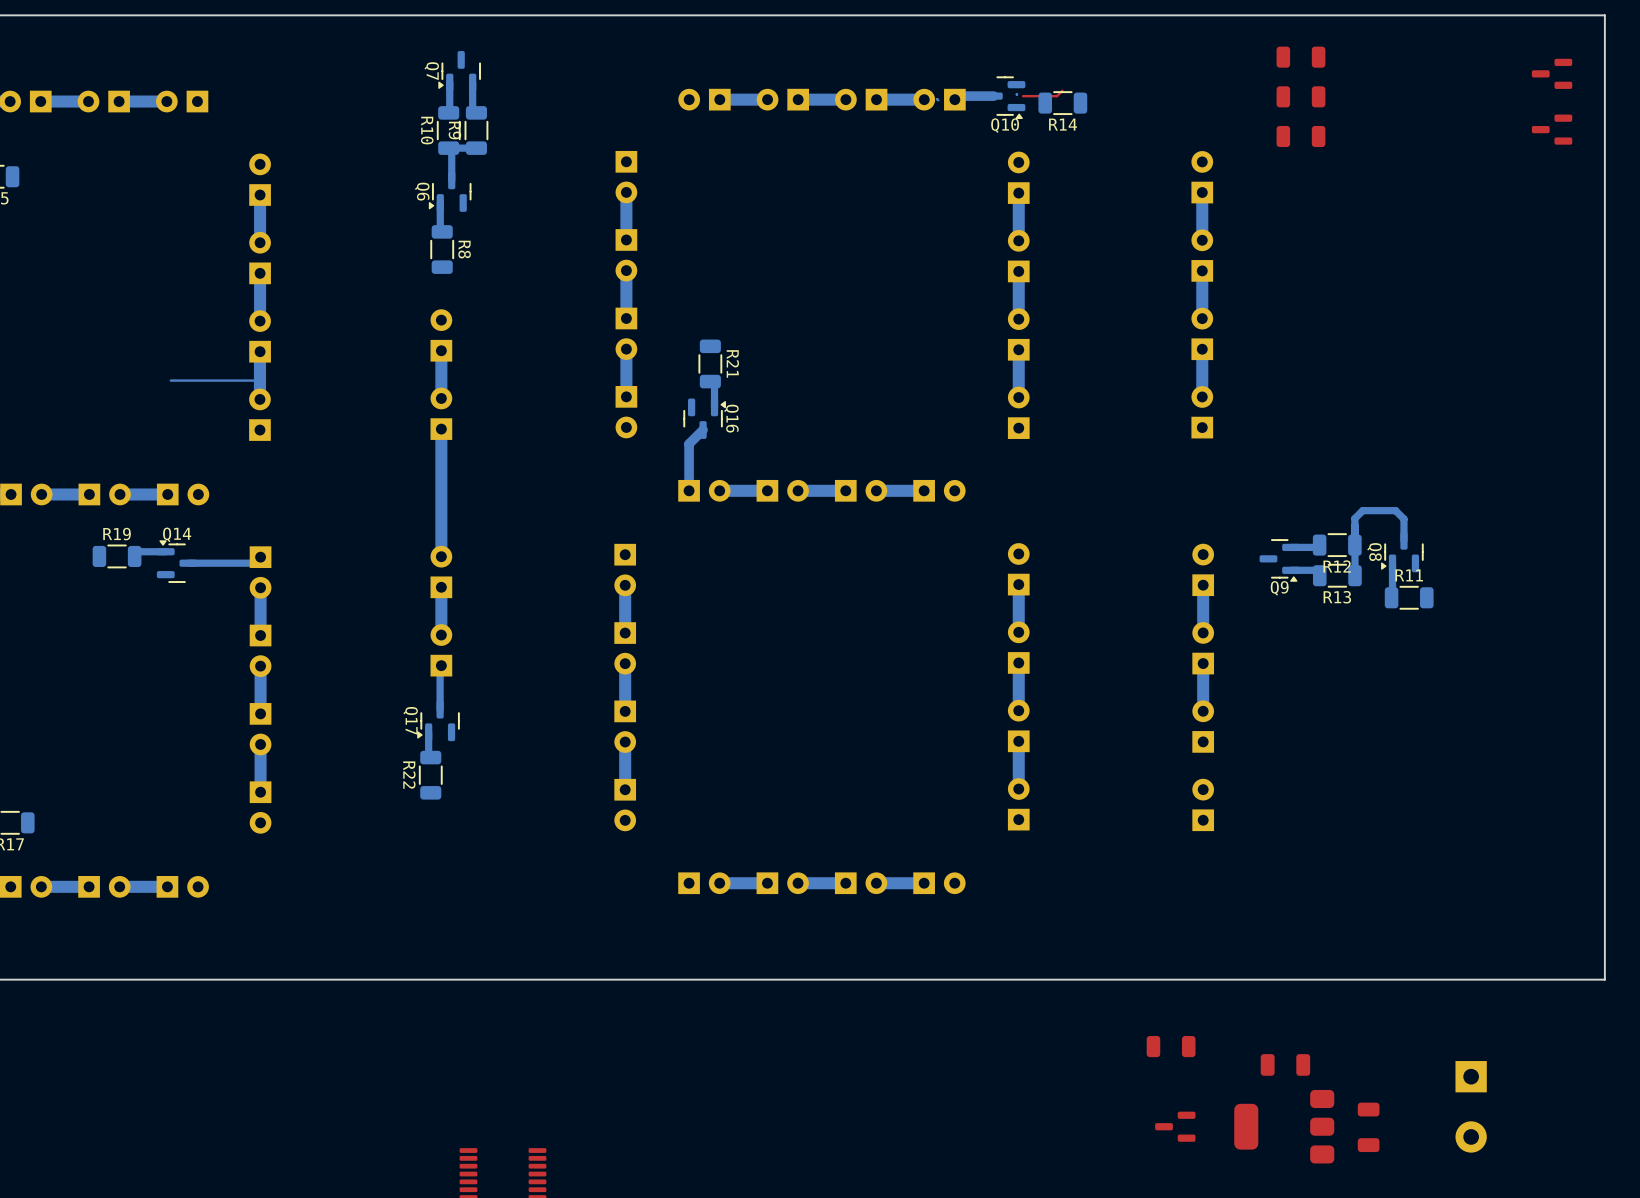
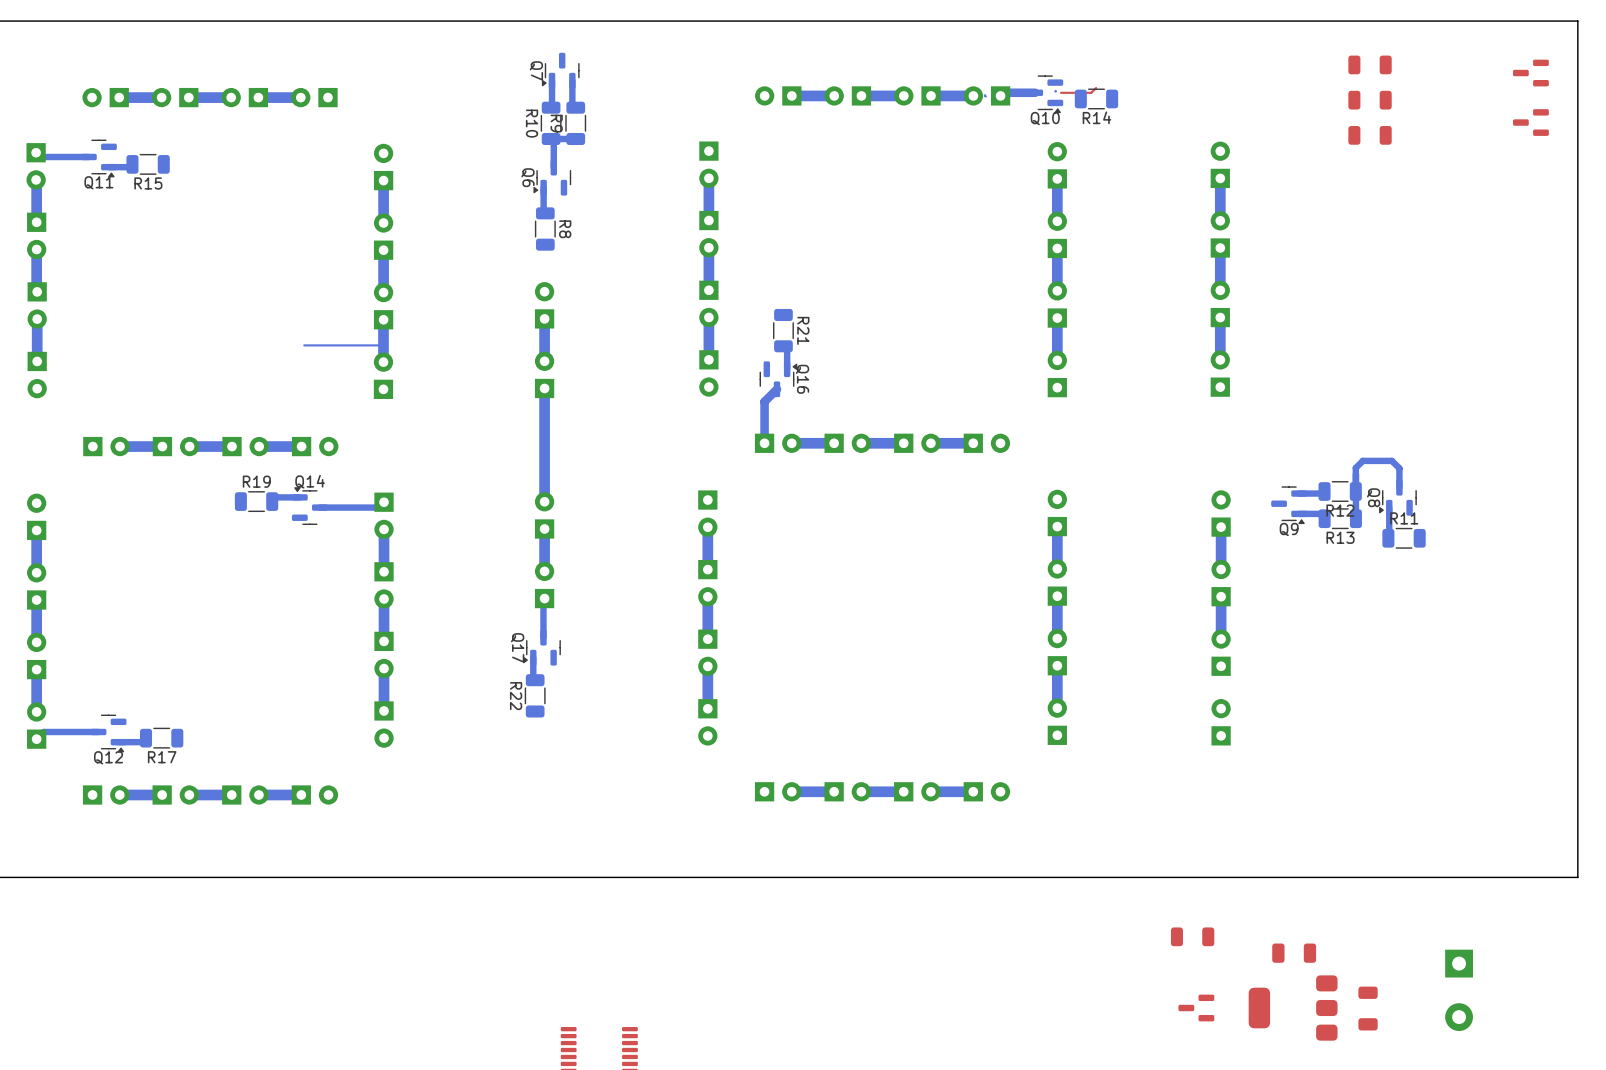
part: (1300, 57) -> none
part: none -> (1370, 64)
part: (1300, 96) -> none
part: none -> (1370, 100)
part: (1300, 136) -> none
part: none -> (1370, 135)

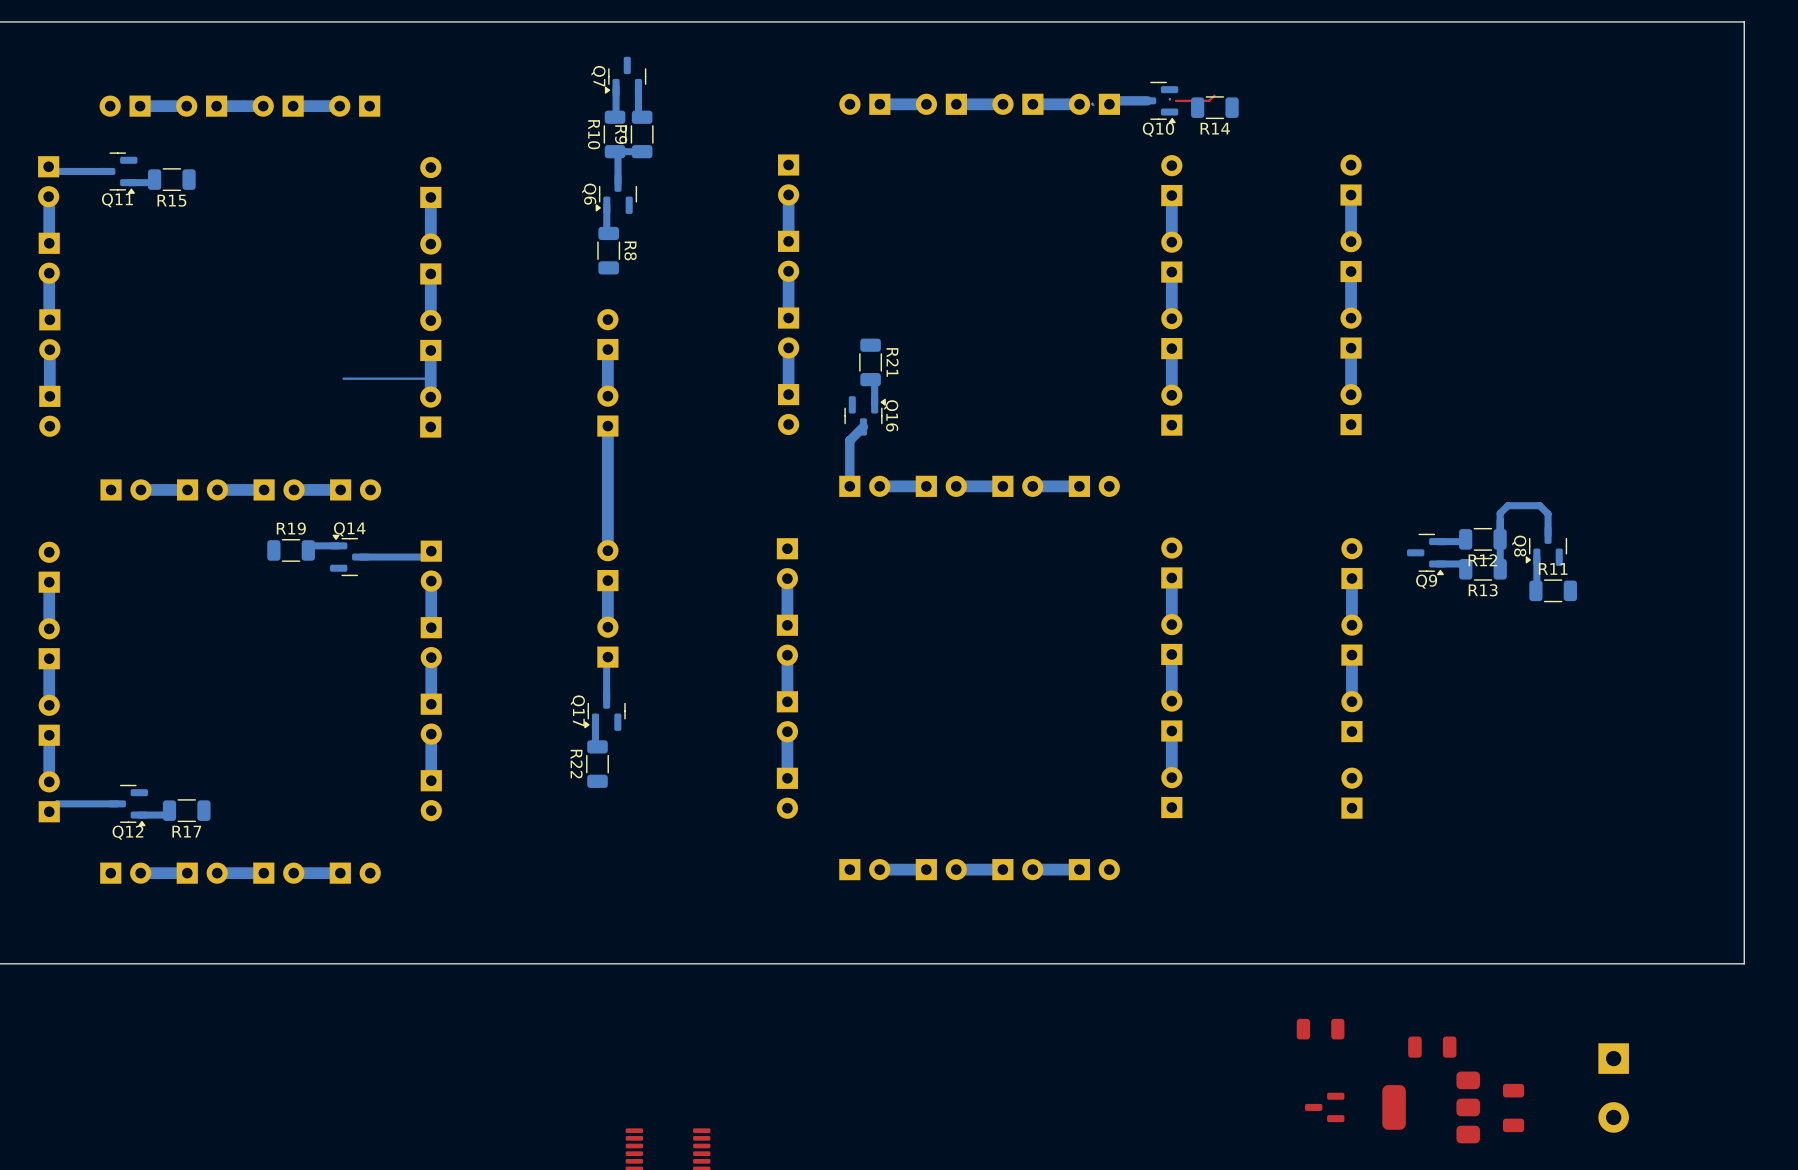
part: (1370, 64) -> none
part: (1530, 73) -> none
part: (1370, 100) -> none
part: (1530, 122) -> none
part: (1370, 135) -> none

